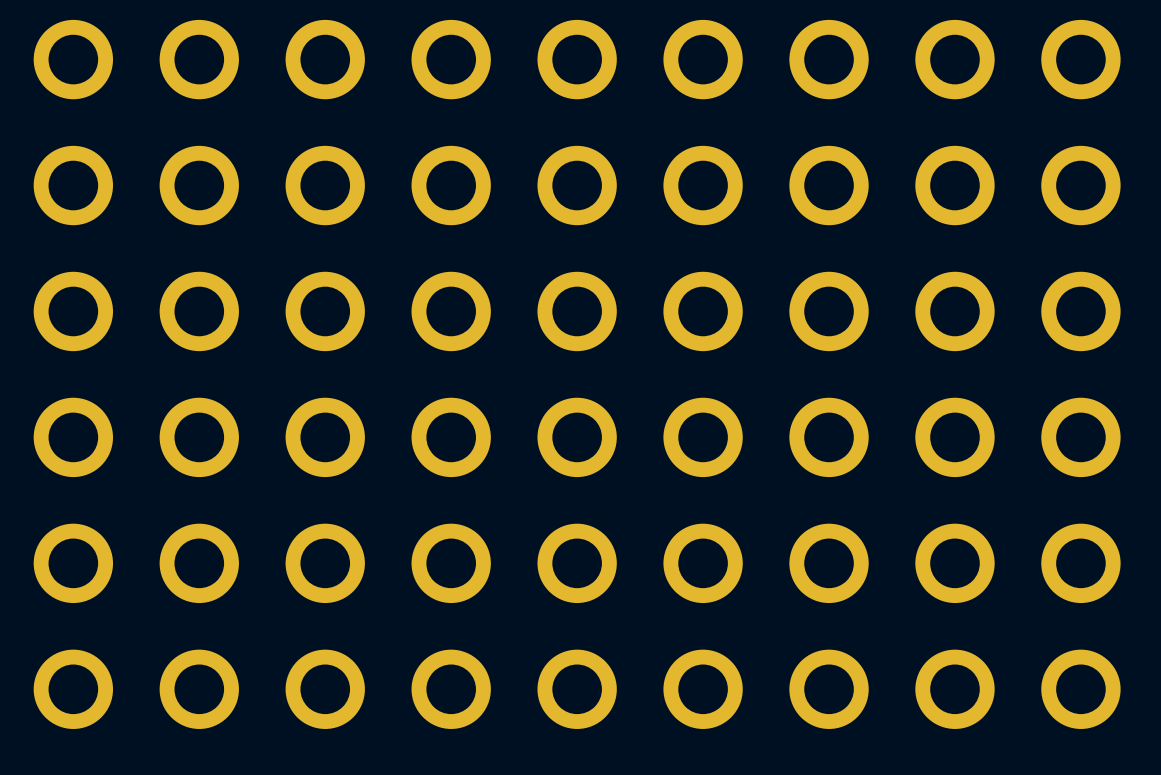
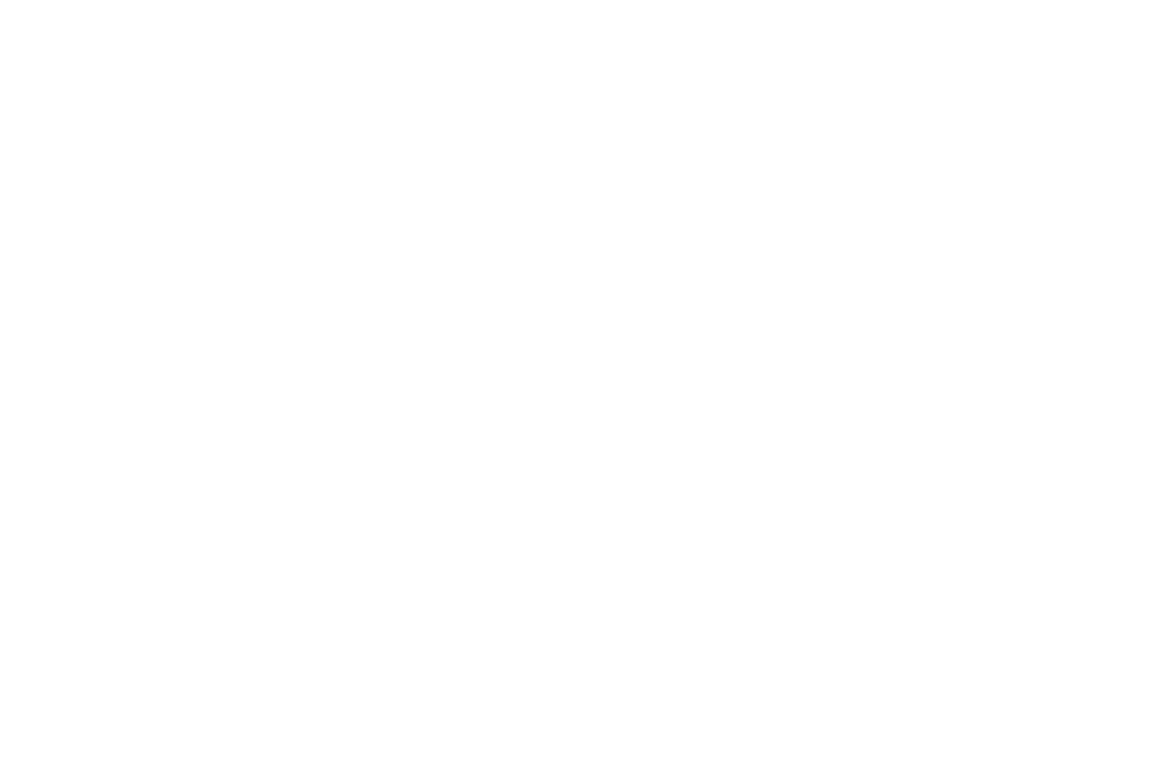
part: (73, 59) -> none
part: (199, 59) -> none
part: (325, 59) -> none
part: (451, 59) -> none
part: (577, 59) -> none
part: (703, 59) -> none
part: (829, 59) -> none
part: (954, 59) -> none
part: (1080, 59) -> none
part: (73, 185) -> none
part: (199, 185) -> none
part: (325, 185) -> none
part: (451, 185) -> none
part: (577, 185) -> none
part: (703, 185) -> none
part: (829, 185) -> none
part: (954, 185) -> none
part: (1080, 185) -> none
part: (73, 311) -> none
part: (199, 311) -> none
part: (325, 311) -> none
part: (451, 311) -> none
part: (577, 311) -> none
part: (703, 311) -> none
part: (829, 311) -> none
part: (954, 311) -> none
part: (1080, 311) -> none
part: (73, 437) -> none
part: (199, 437) -> none
part: (325, 437) -> none
part: (451, 437) -> none
part: (577, 437) -> none
part: (703, 437) -> none
part: (829, 437) -> none
part: (954, 437) -> none
part: (1080, 437) -> none
part: (73, 563) -> none
part: (199, 563) -> none
part: (325, 563) -> none
part: (451, 563) -> none
part: (577, 563) -> none
part: (703, 563) -> none
part: (829, 563) -> none
part: (954, 563) -> none
part: (1080, 563) -> none
part: (73, 689) -> none
part: (199, 689) -> none
part: (325, 689) -> none
part: (451, 689) -> none
part: (577, 689) -> none
part: (703, 689) -> none
part: (829, 689) -> none
part: (954, 689) -> none
part: (1080, 689) -> none

